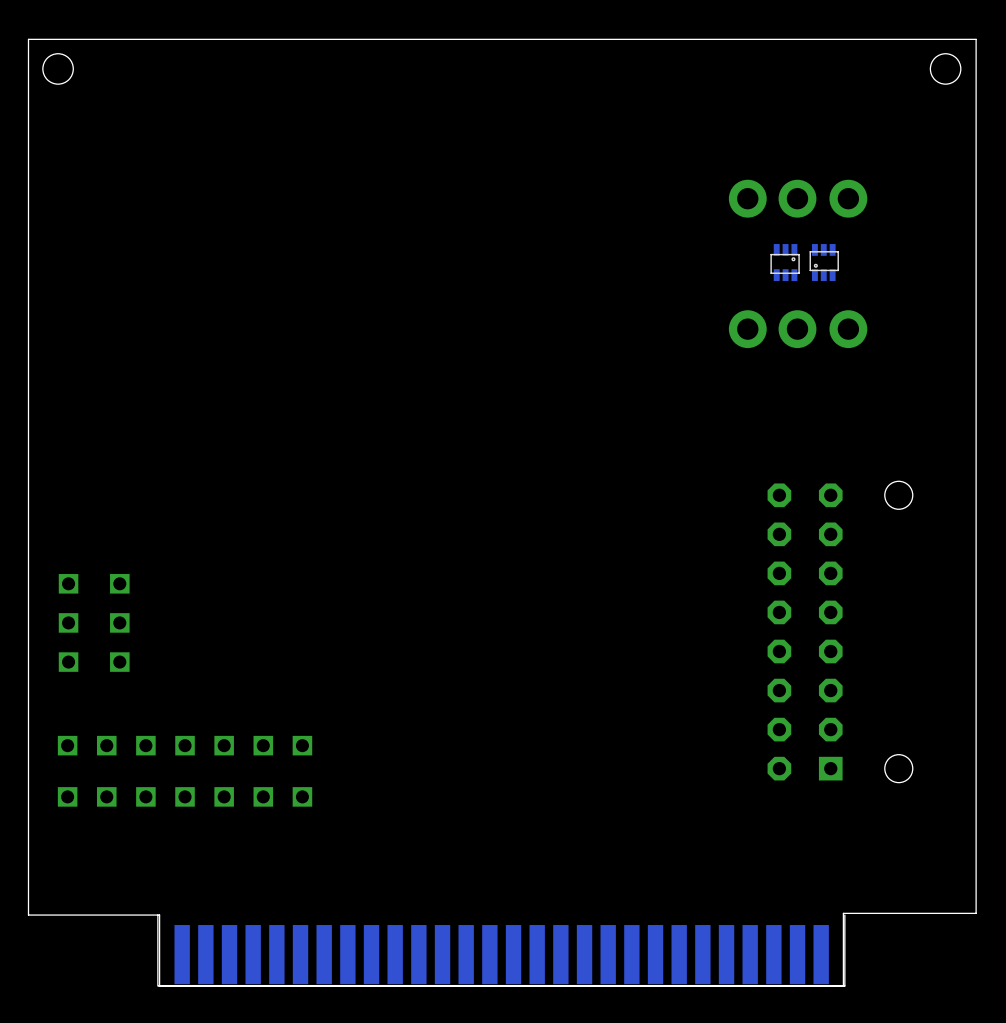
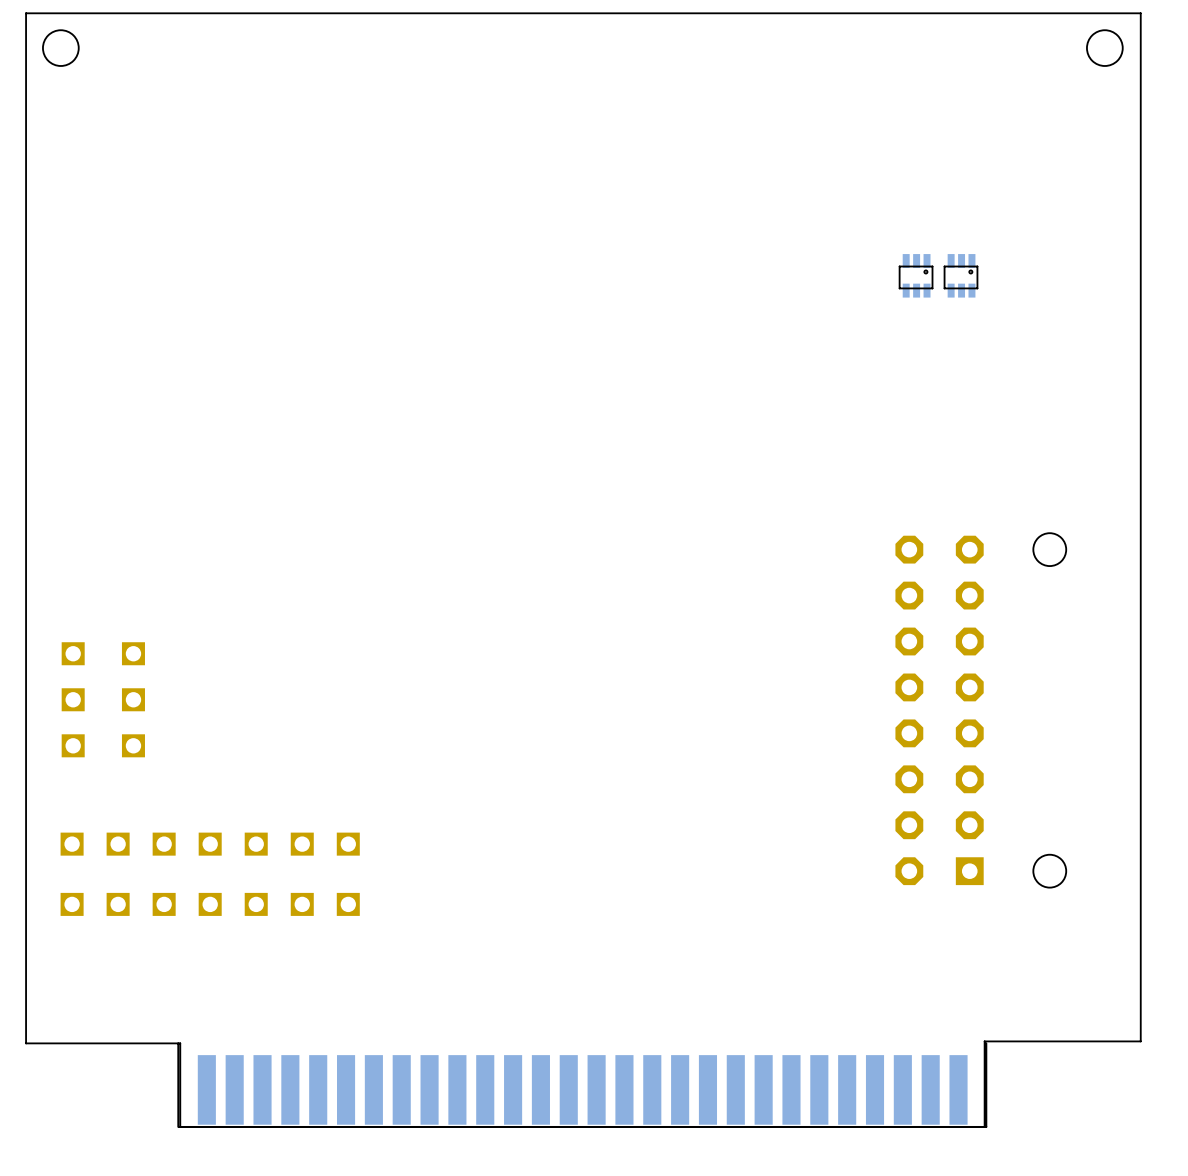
part: (798, 198) -> none
part rotation: 0° (824, 262) -> 180° (961, 275)
part: (798, 329) -> none

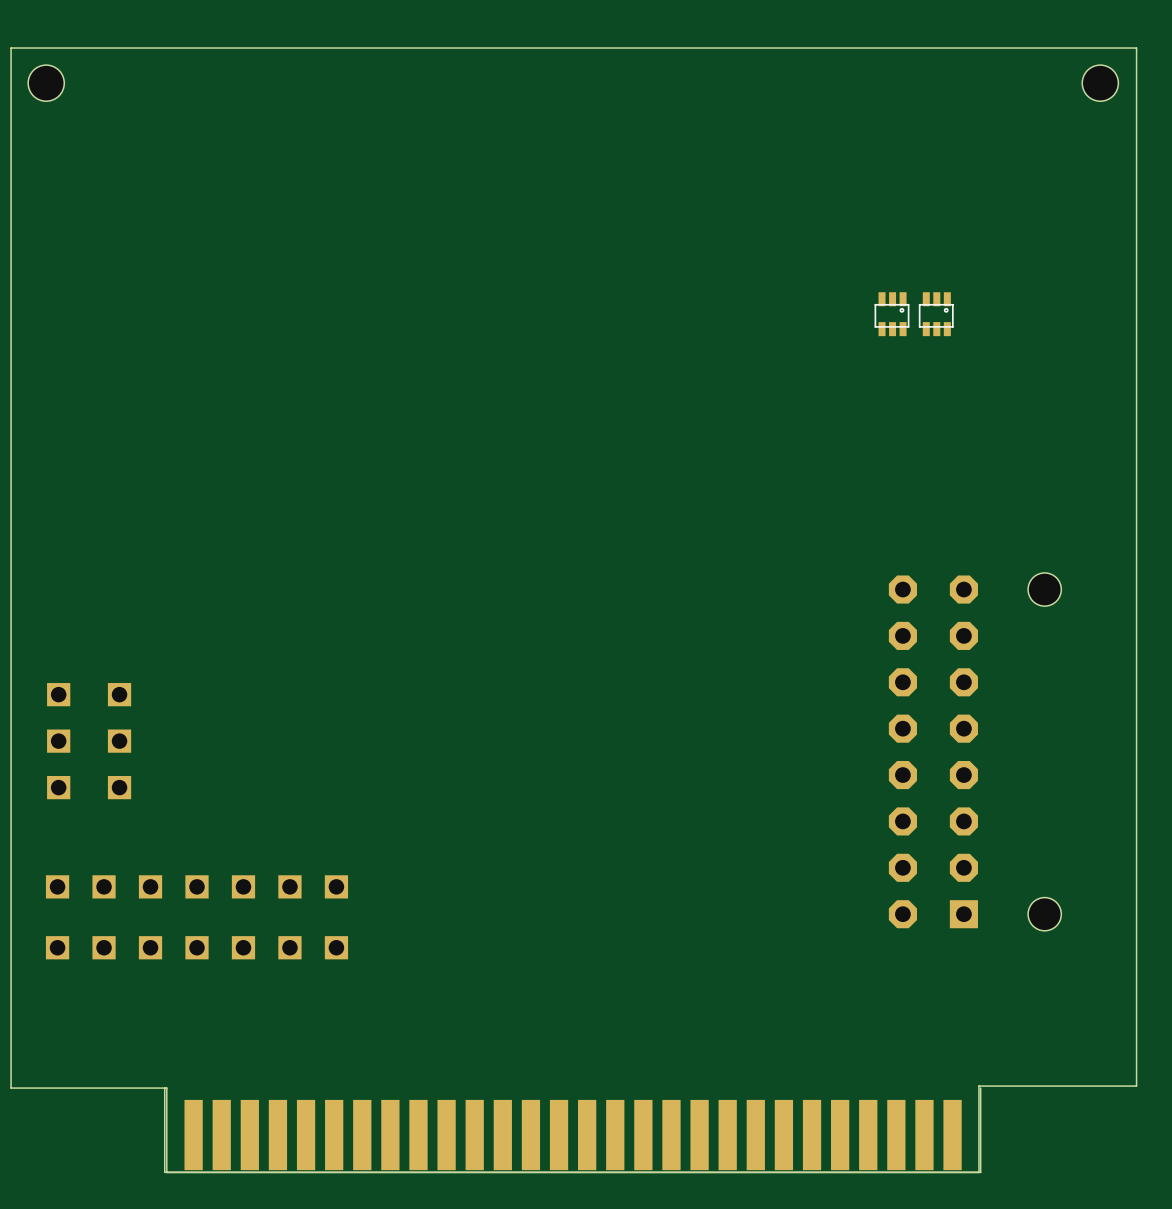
part: (916, 275) -> none
part: (961, 275) -> none
part: none -> (891, 314)
part: none -> (936, 314)

